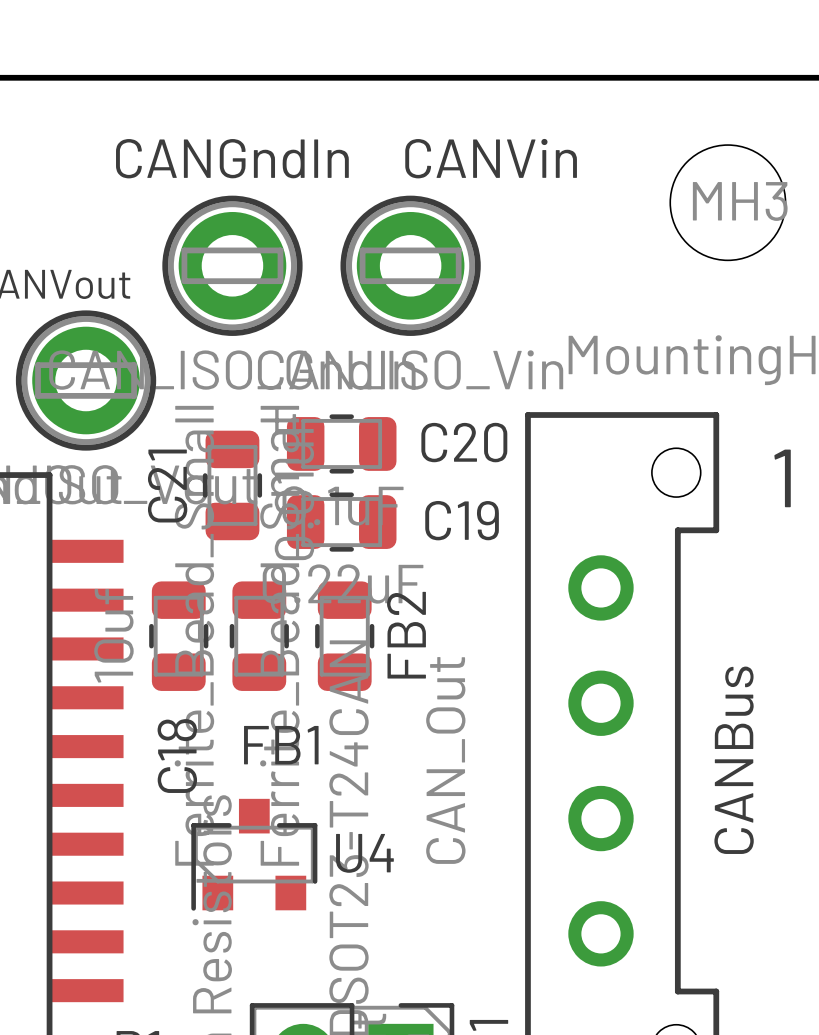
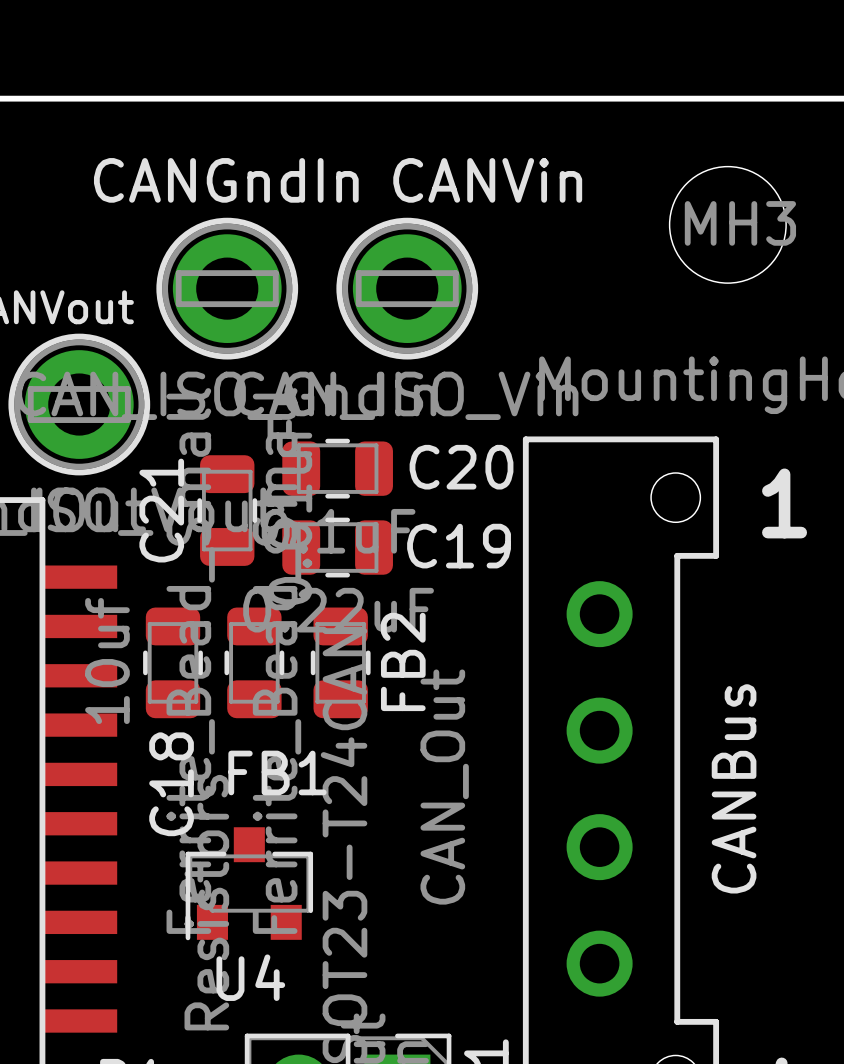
U4 name position: U4 (364, 853) -> U4 (250, 977)

